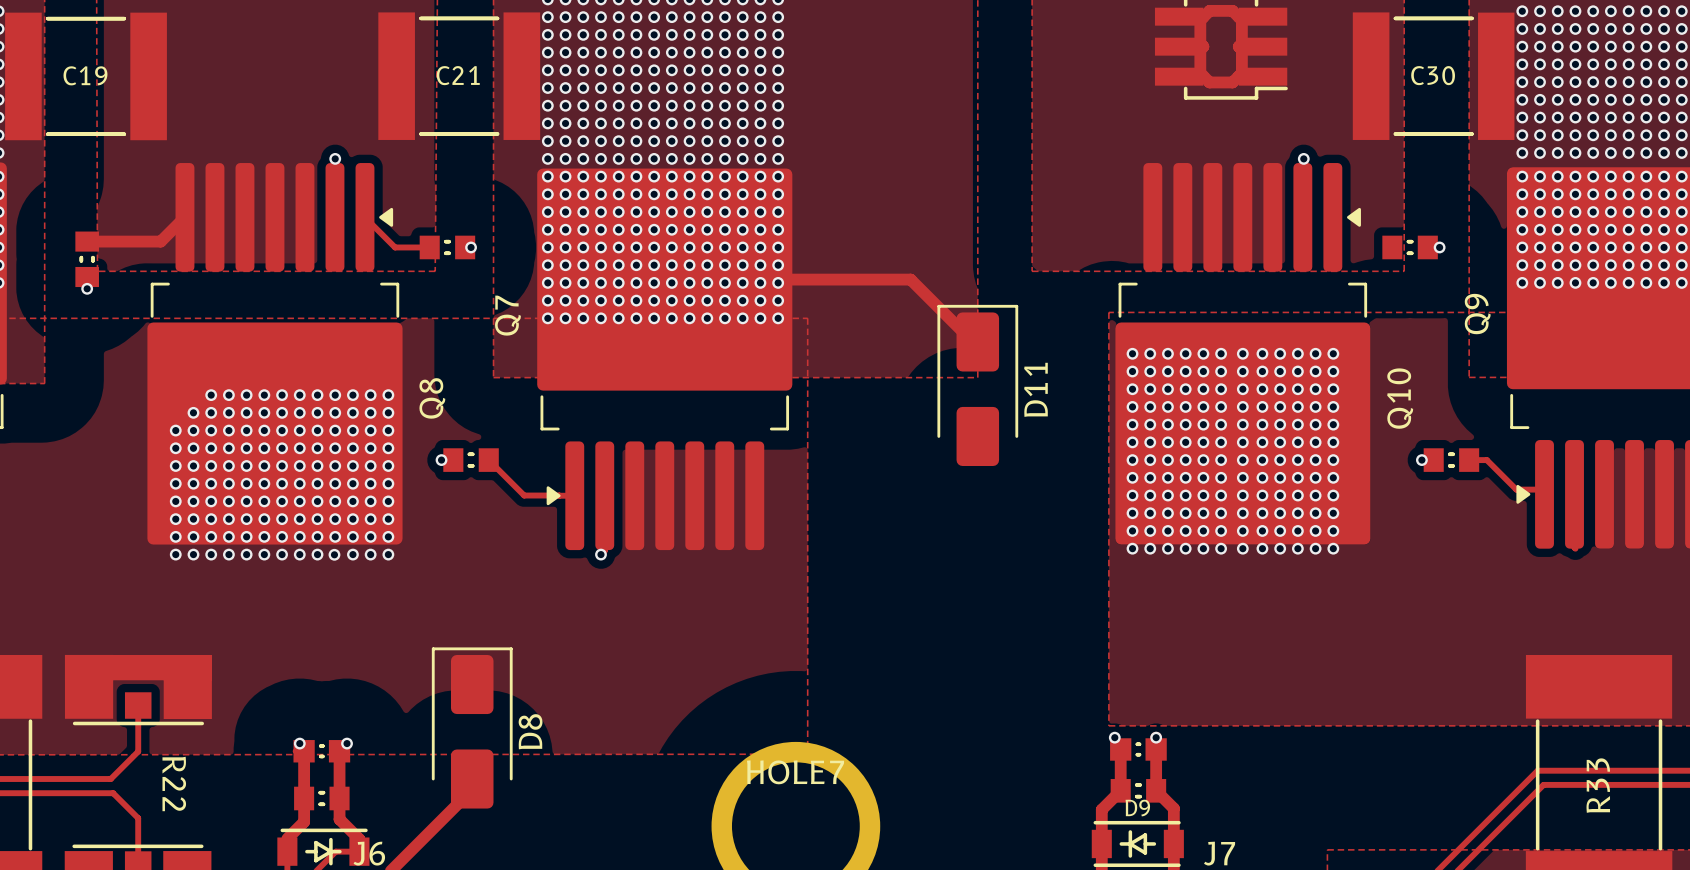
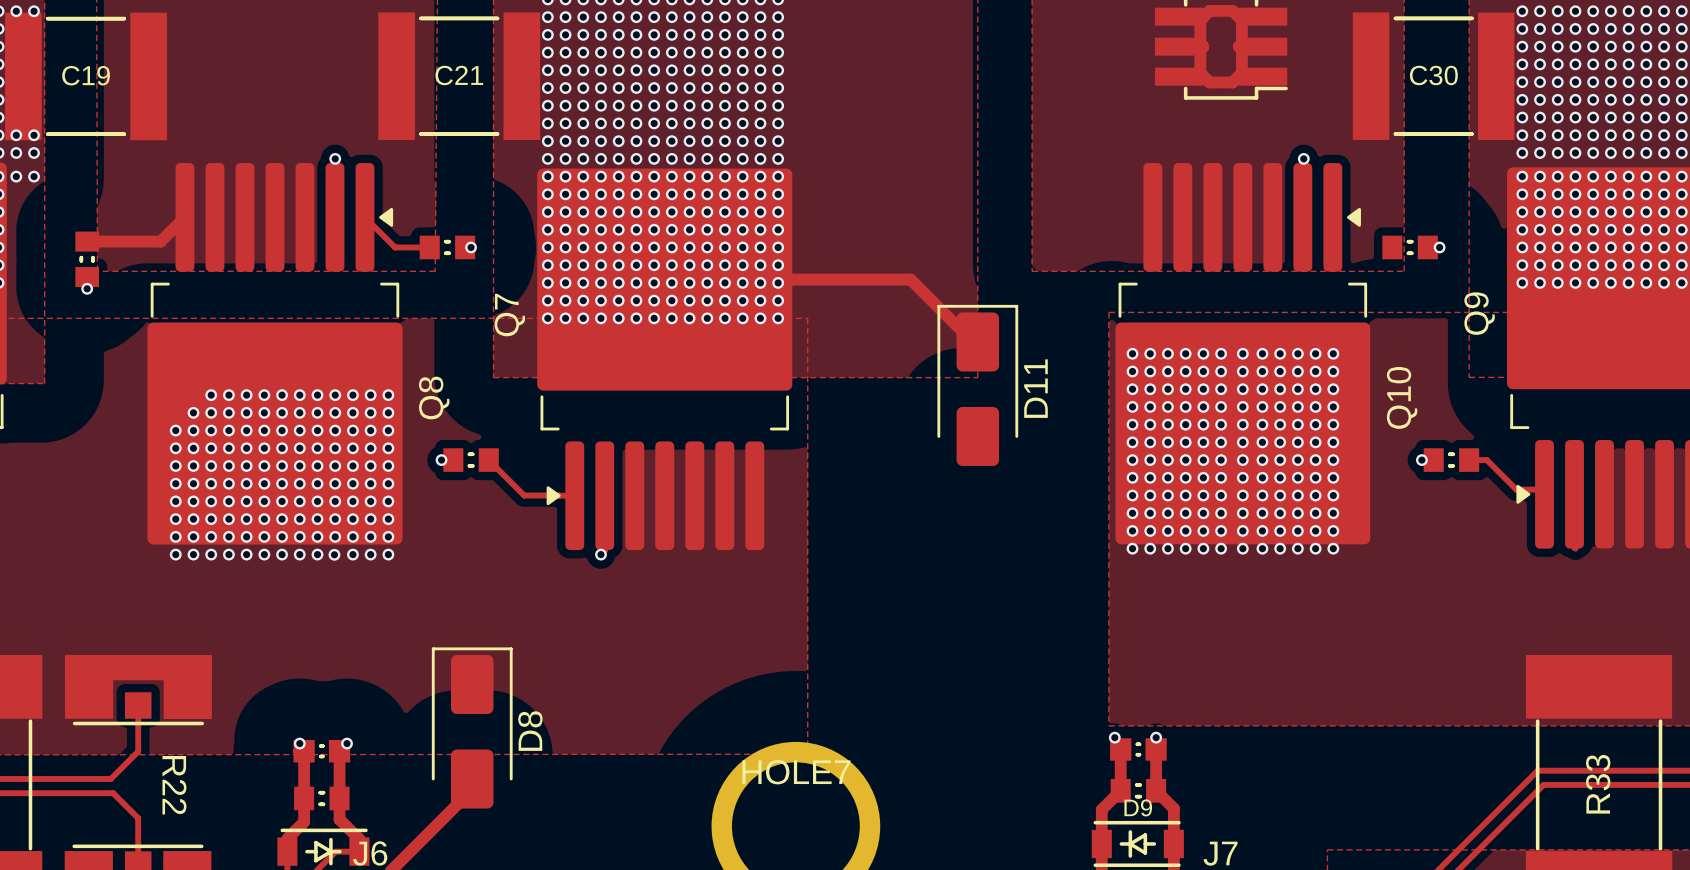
via: none -> (16, 11)
via: none -> (34, 11)
via: none -> (16, 135)
via: none -> (34, 135)
via: none -> (16, 152)
via: none -> (34, 152)
via: none -> (16, 176)
via: none -> (34, 176)

